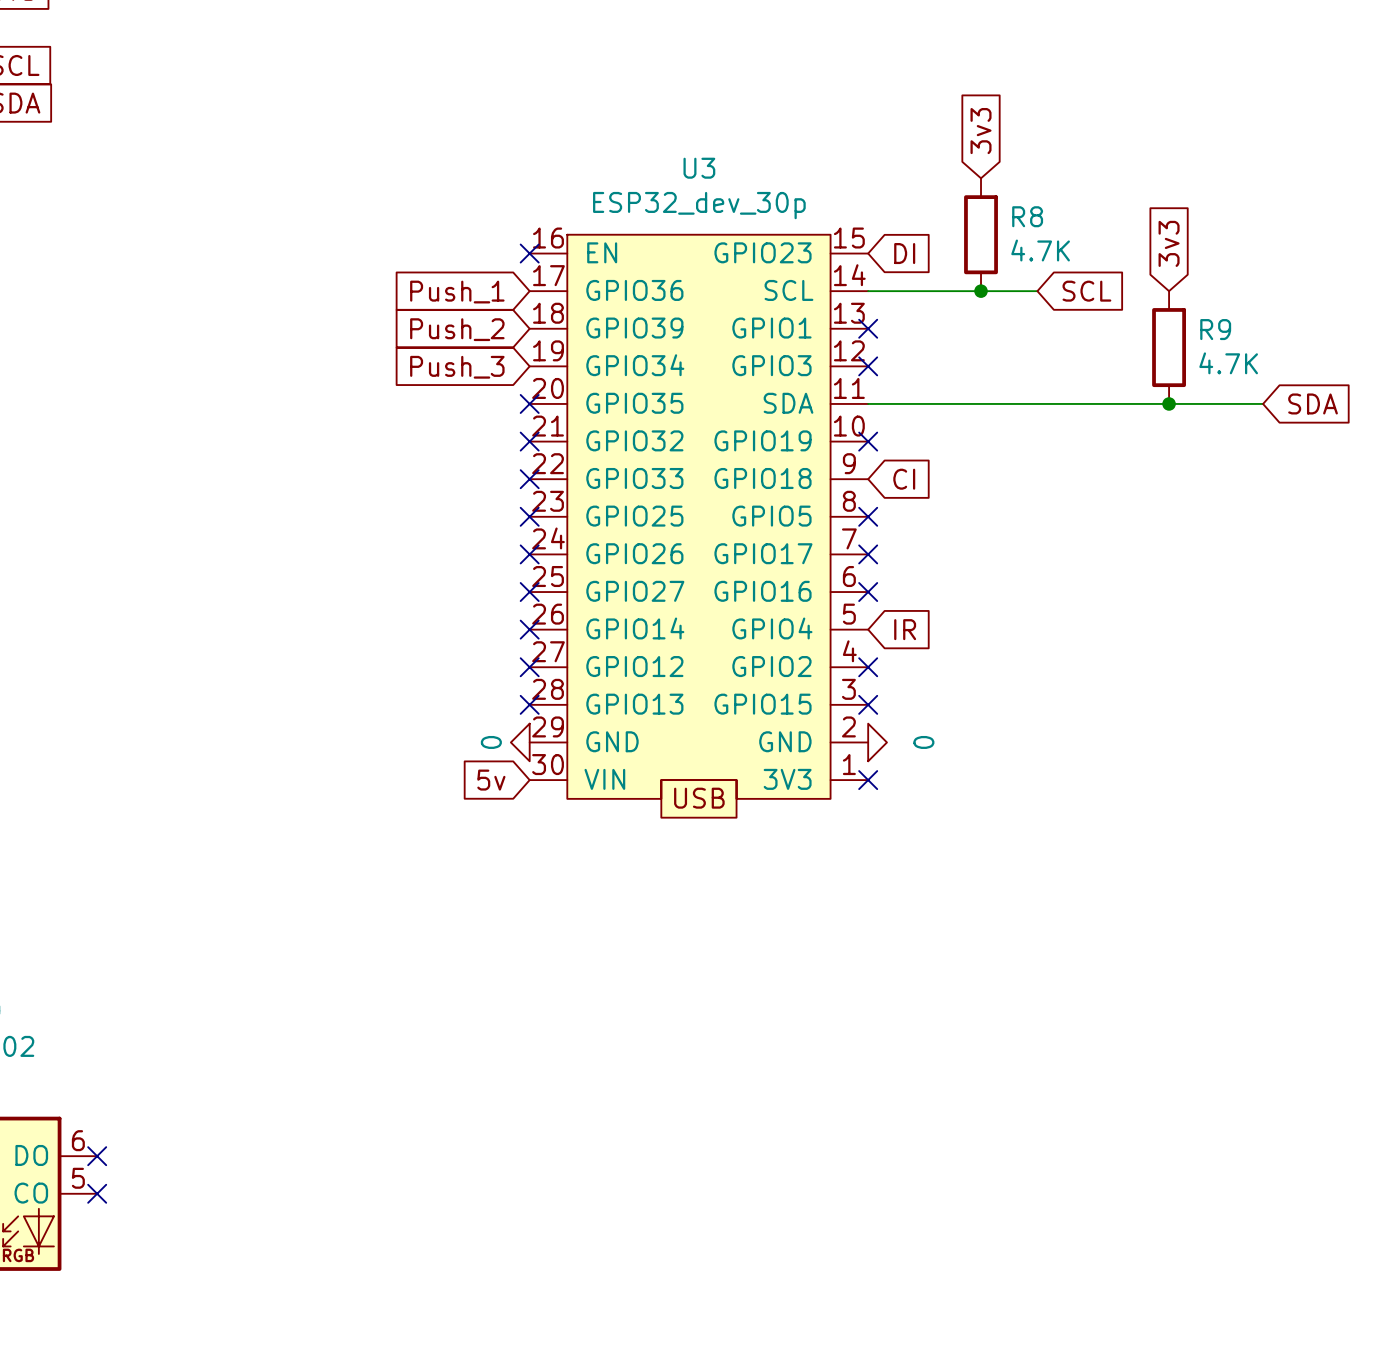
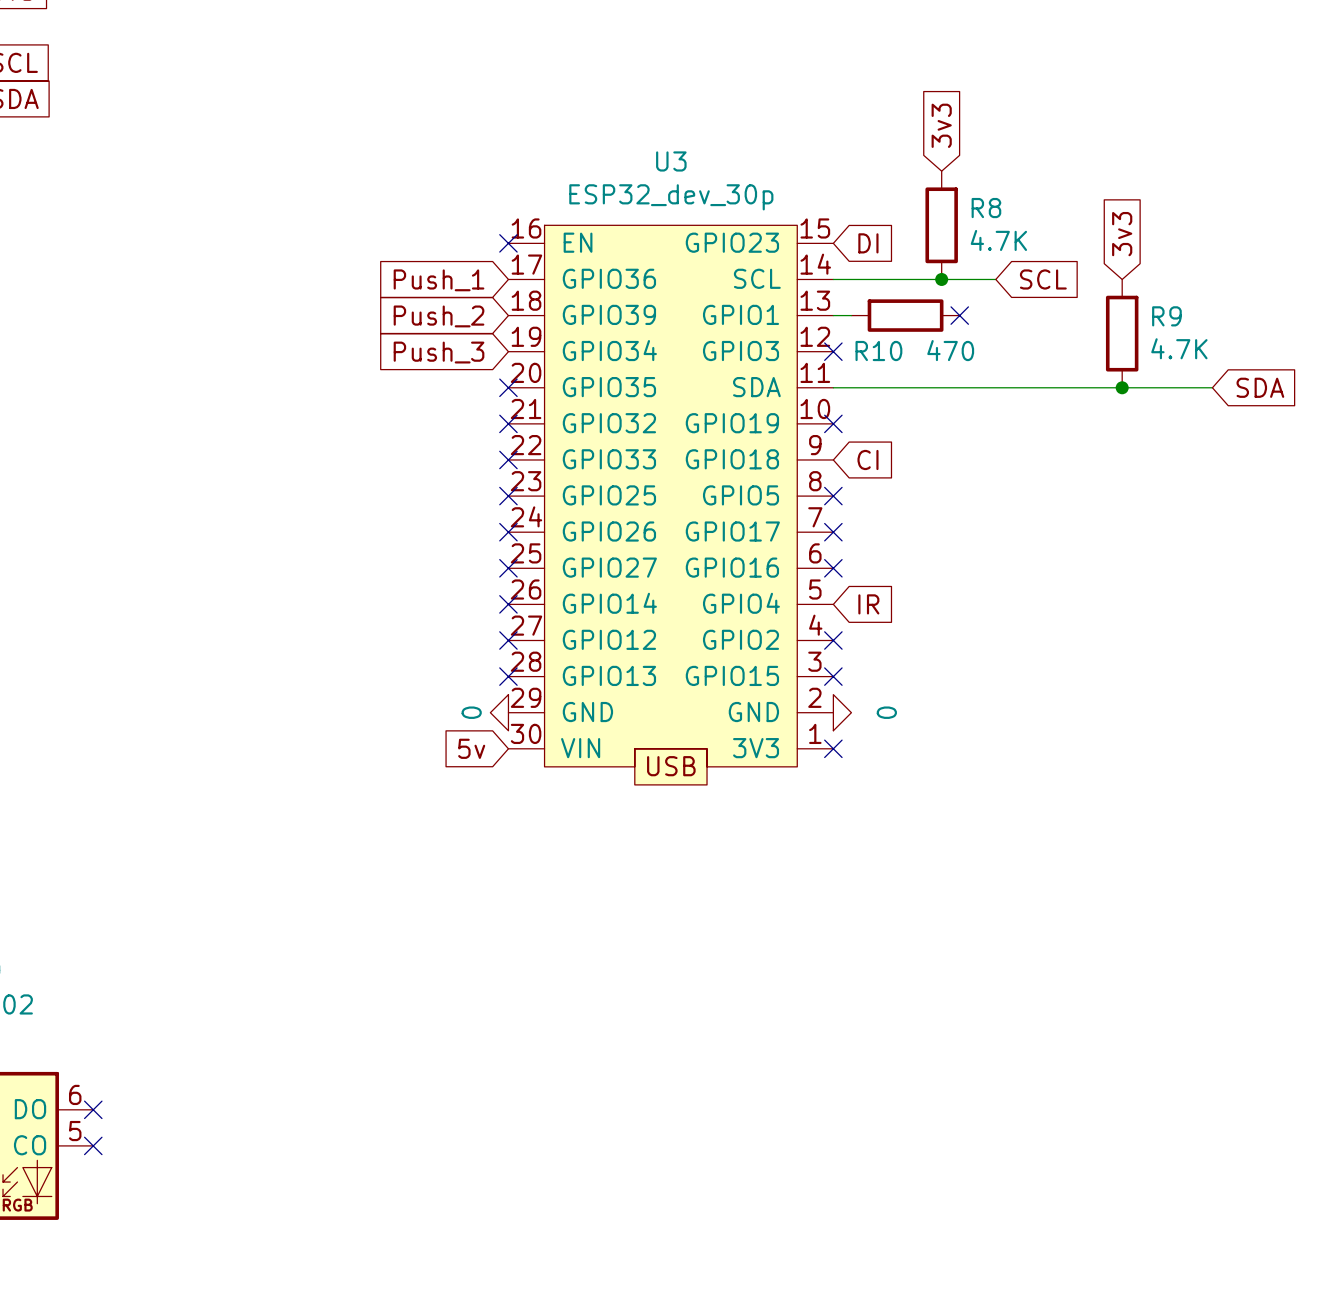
wire: none -> (833, 315) (851, 315)
no-connect mark: (868, 328) -> none
R10: none -> 470 (905, 315)
no-connect mark: none -> (959, 315)

